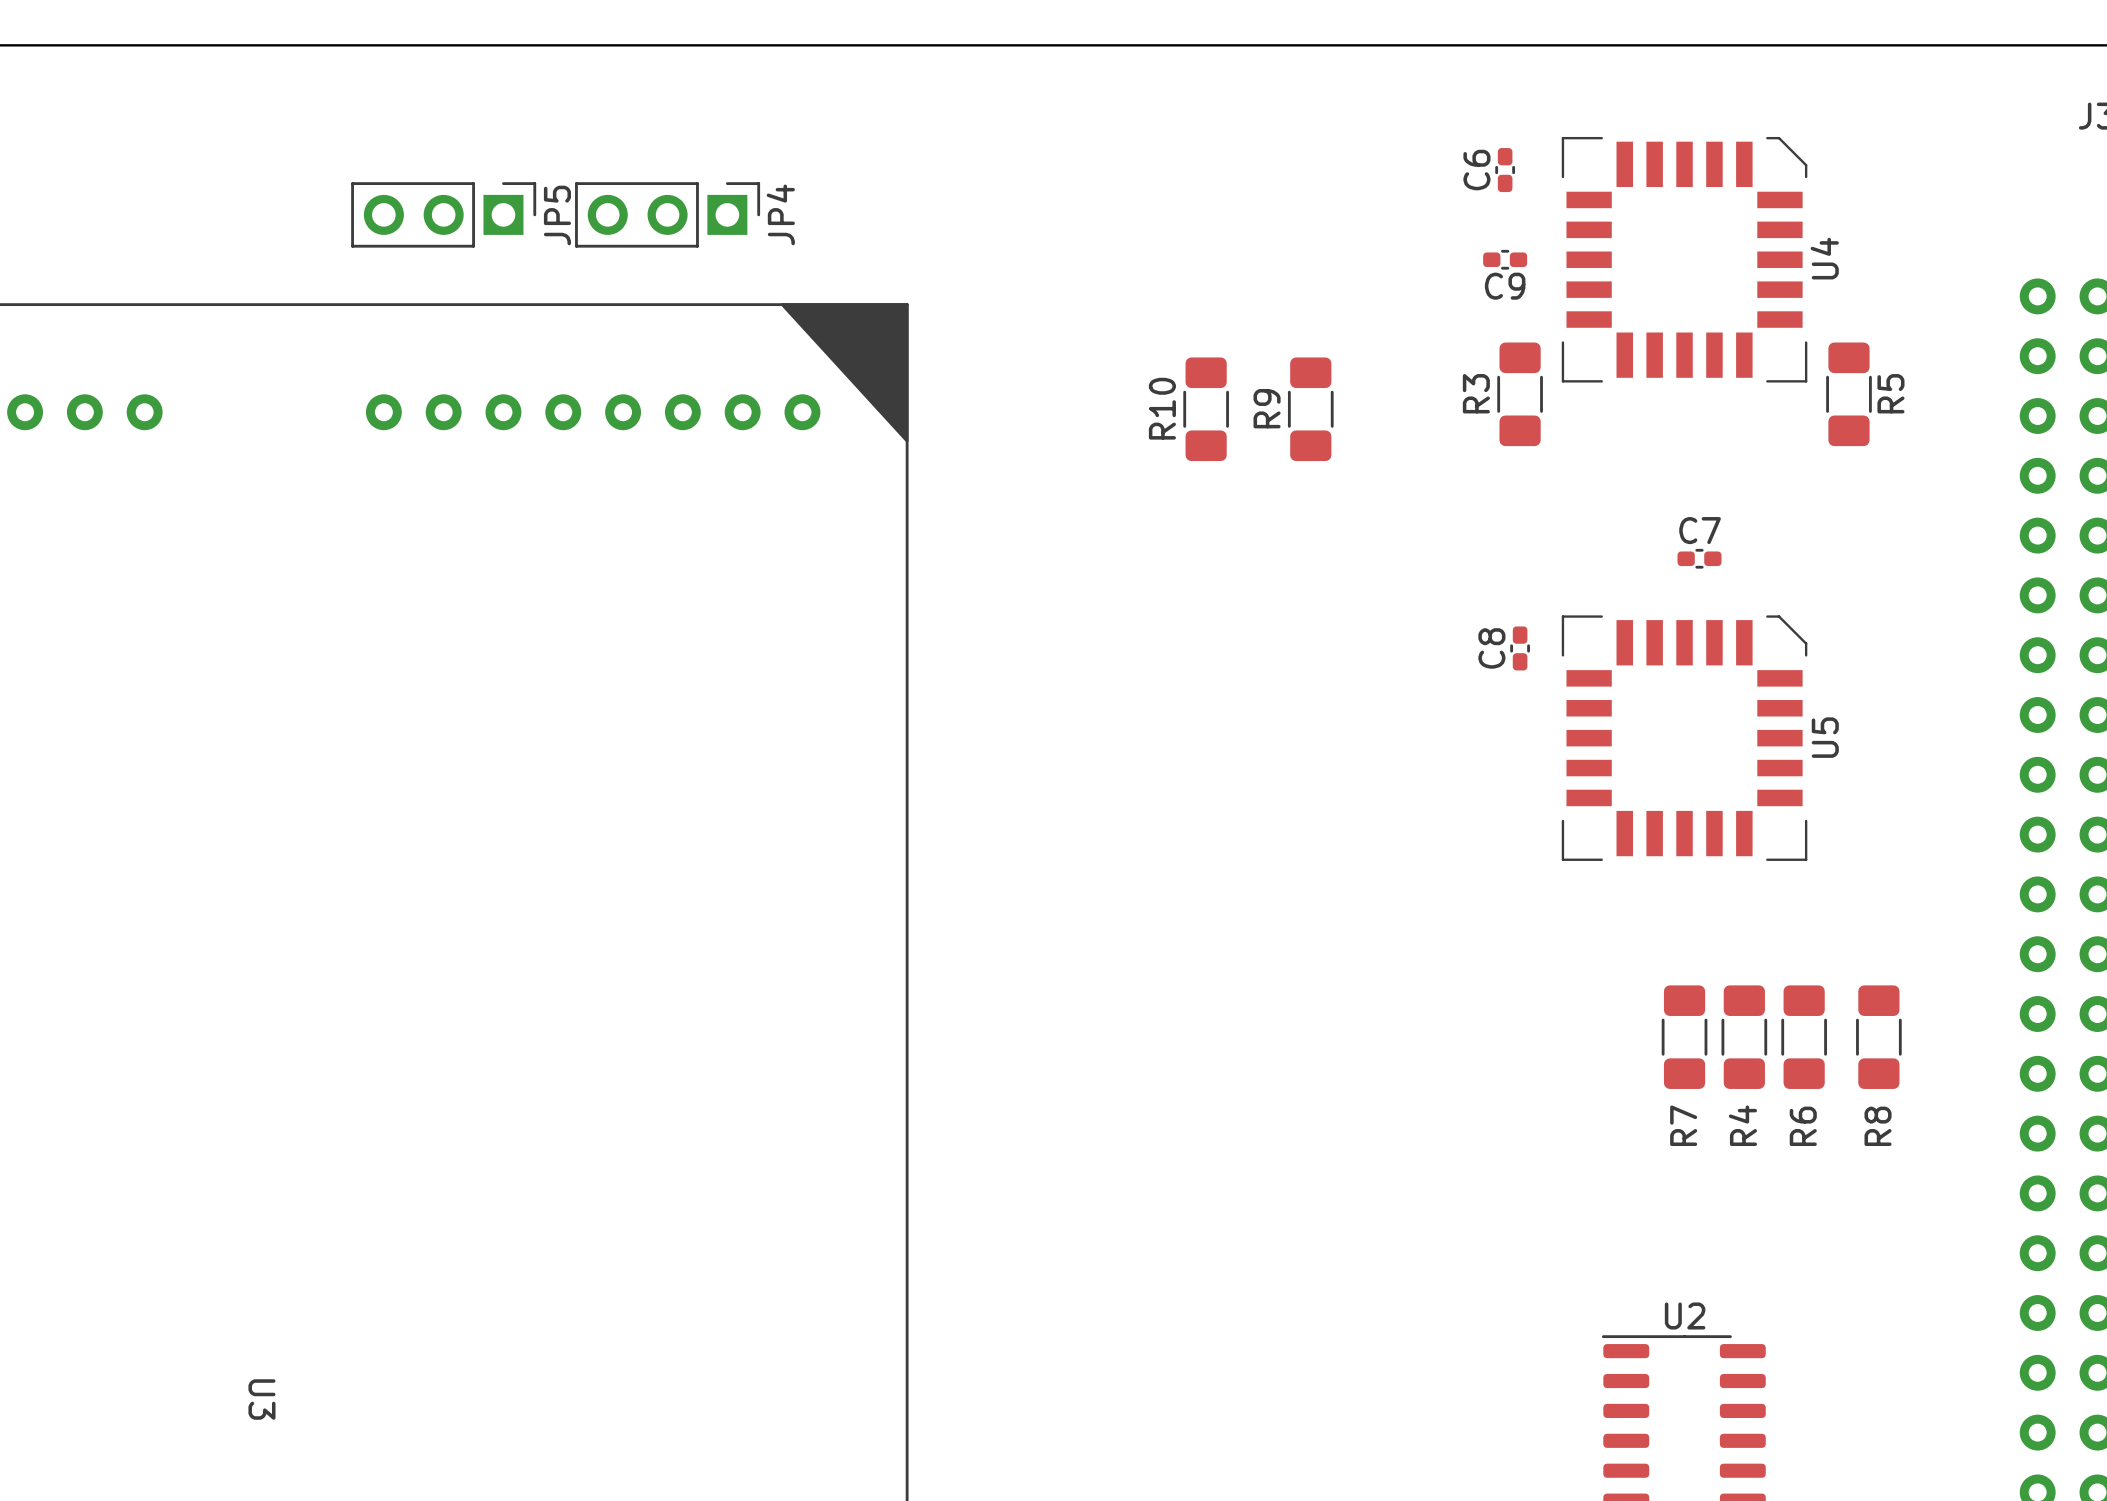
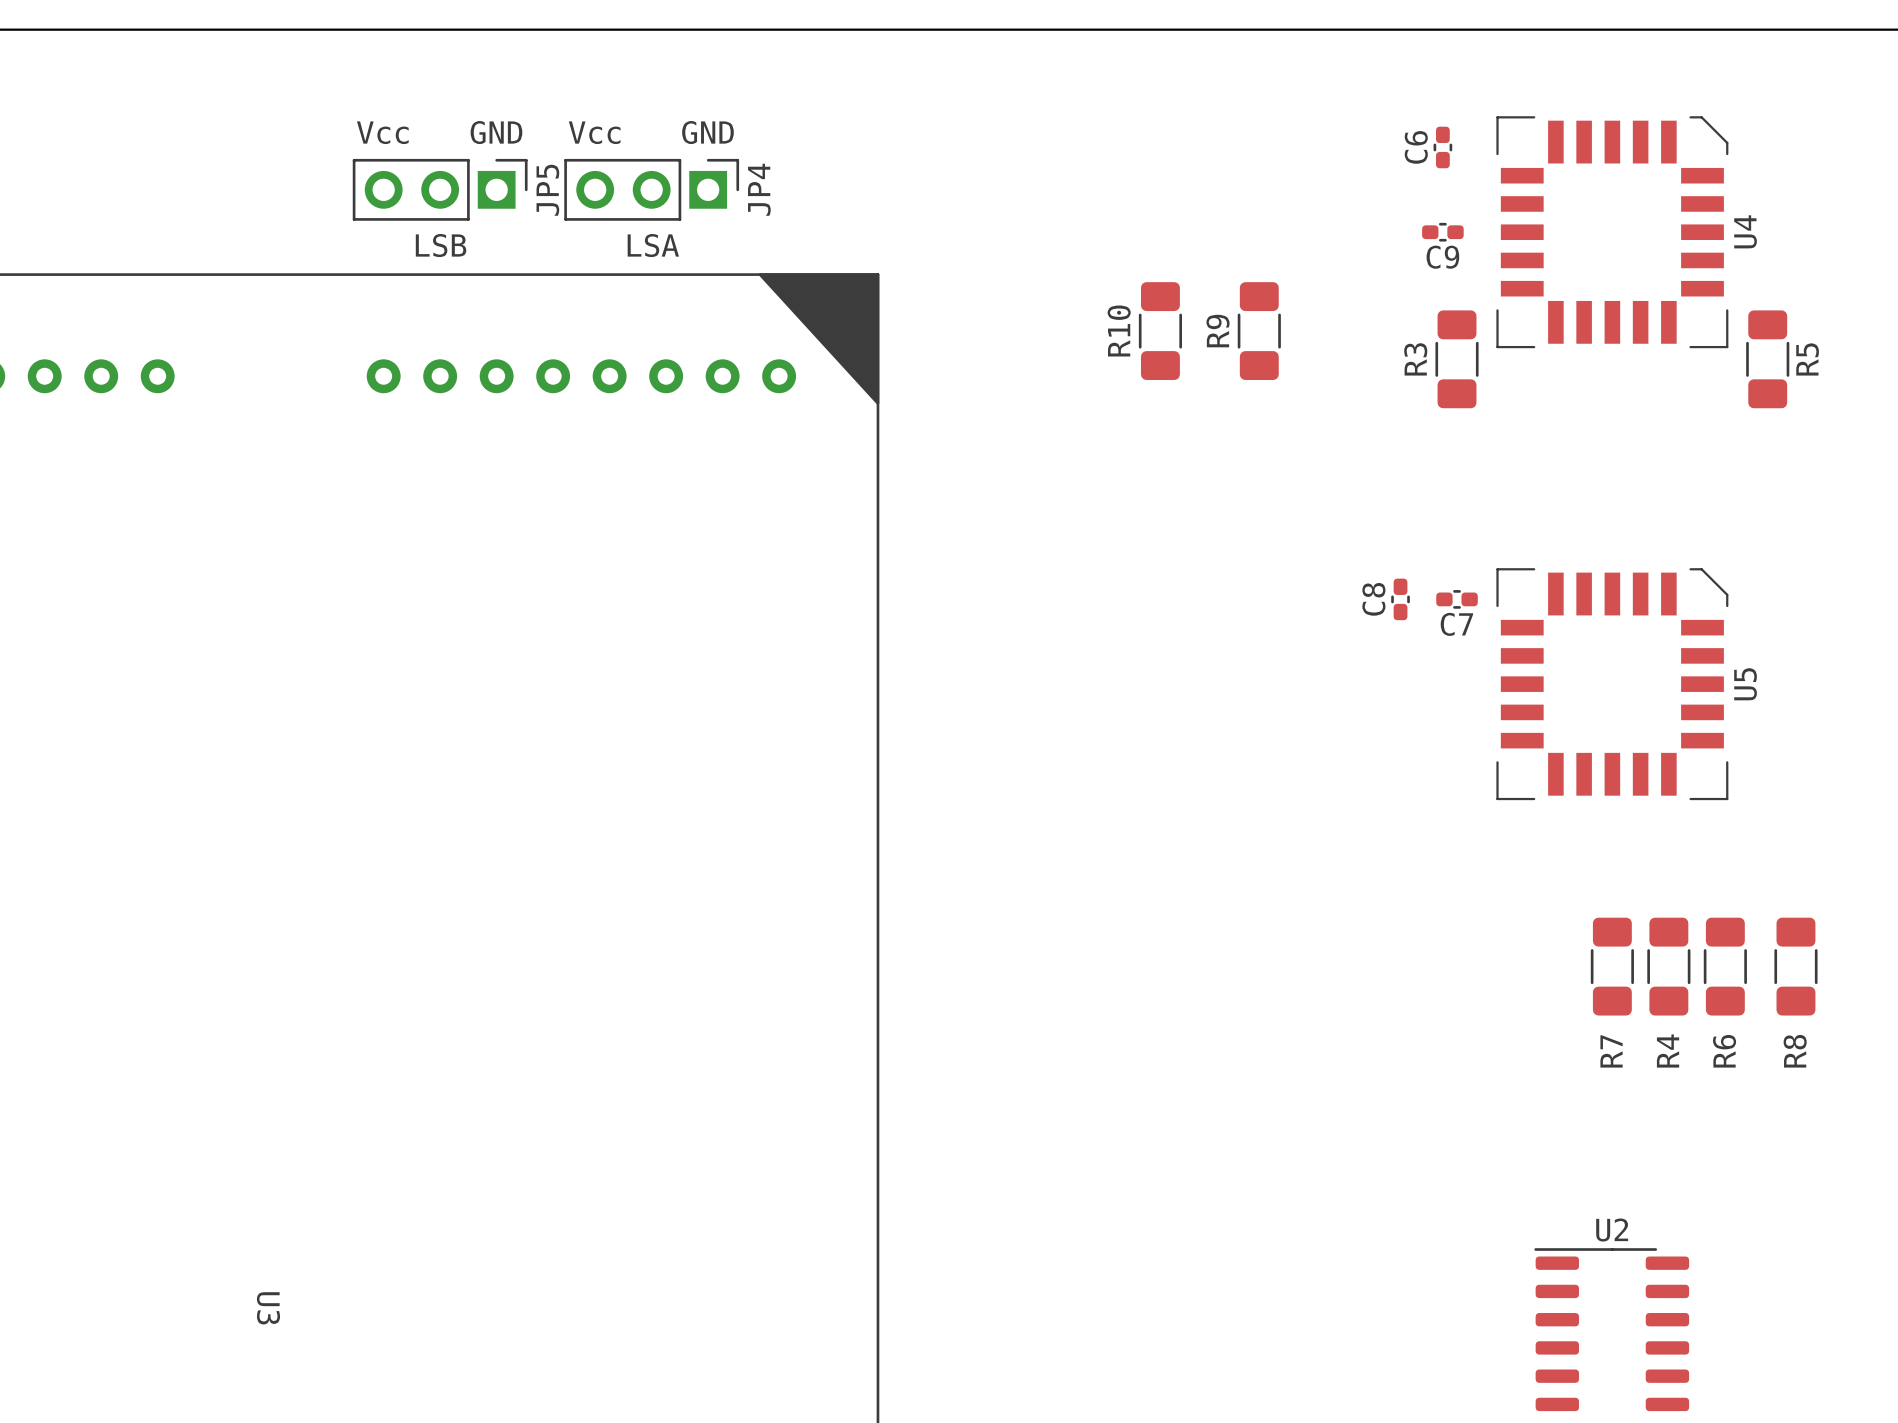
text: none -> Vcc (382, 132)
text: none -> GND (496, 132)
text: none -> Vcc (594, 132)
text: none -> GND (707, 132)
text: none -> LSB (441, 245)
text: none -> LSA (653, 245)
R10 position: (1206, 409) -> (1160, 331)
R9 position: (1310, 409) -> (1259, 331)
C7 name position: C7 (1700, 530) -> C7 (1456, 624)
C7 position: (1699, 558) -> (1457, 599)
C8 position: (1520, 648) -> (1400, 599)

